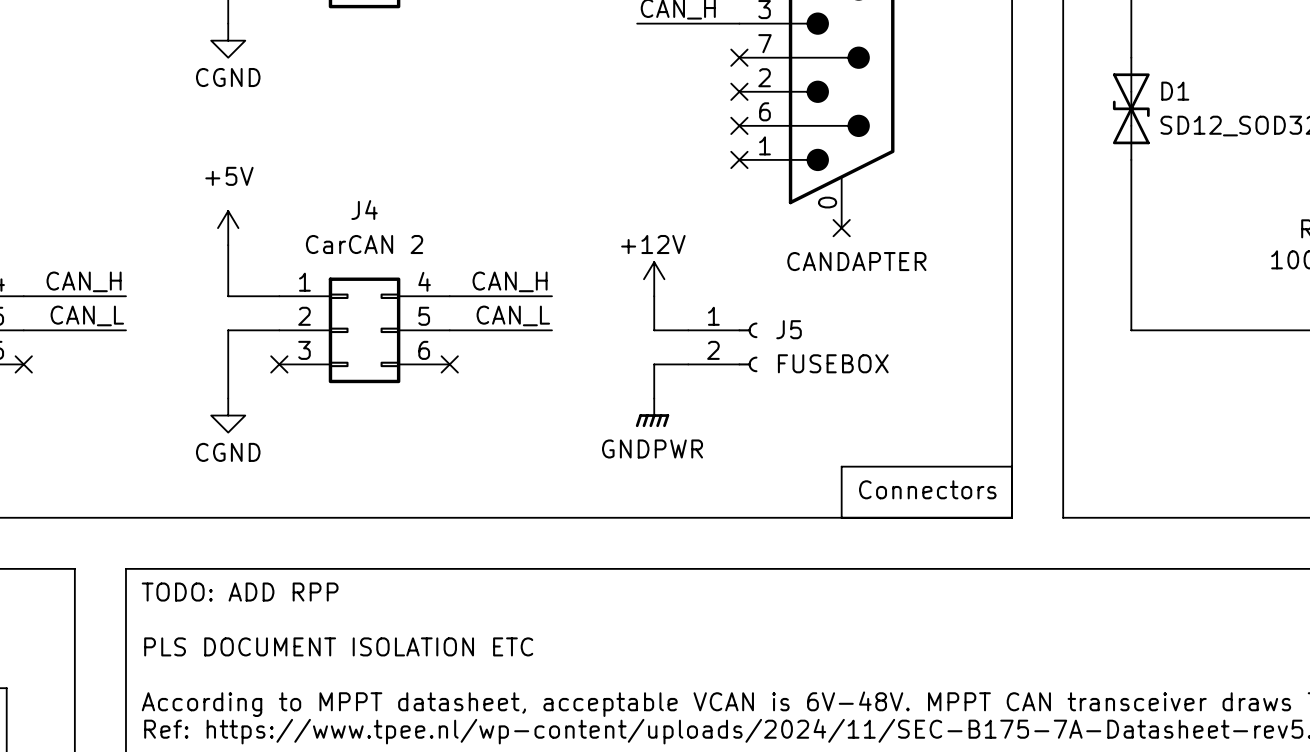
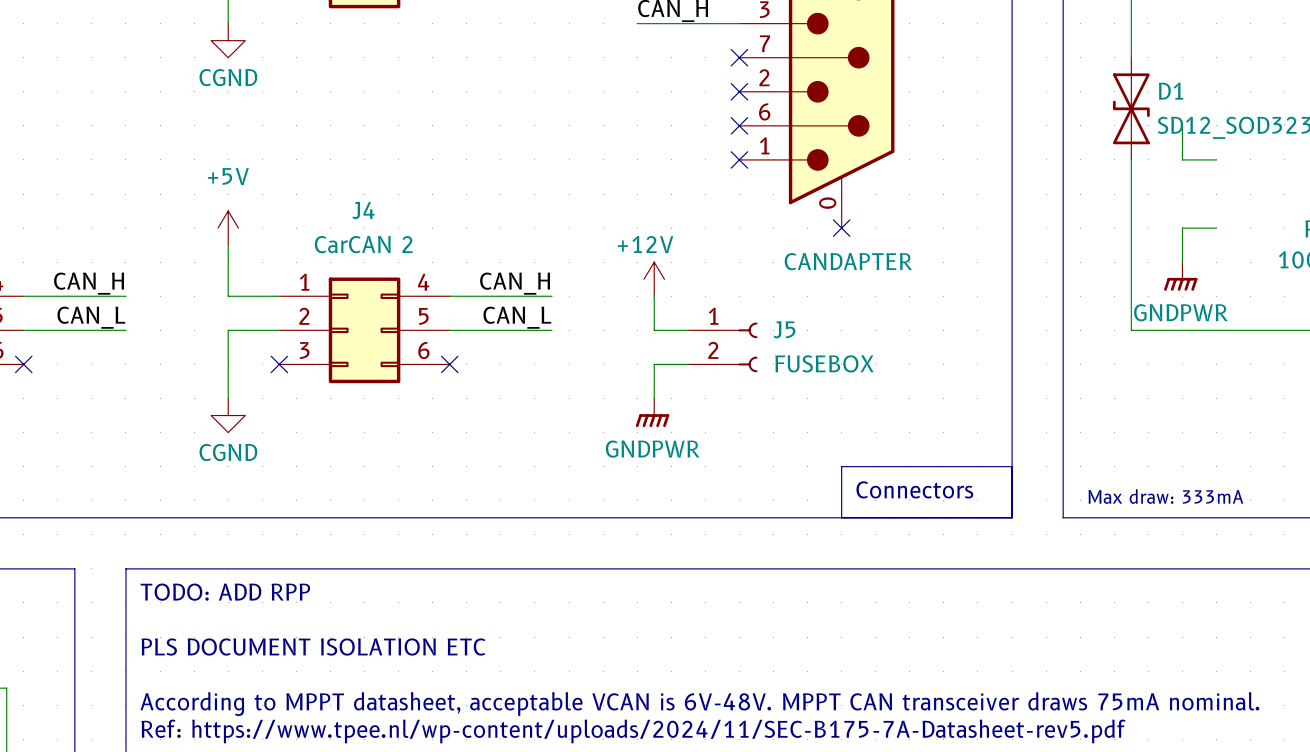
wire: none -> (1182, 125) (1182, 159) (1216, 159)
wire: none -> (1216, 228) (1182, 228) (1182, 262)
power symbol: none -> GNDPWR (1180, 276)
text: none -> Max draw: 333mA (1165, 496)

